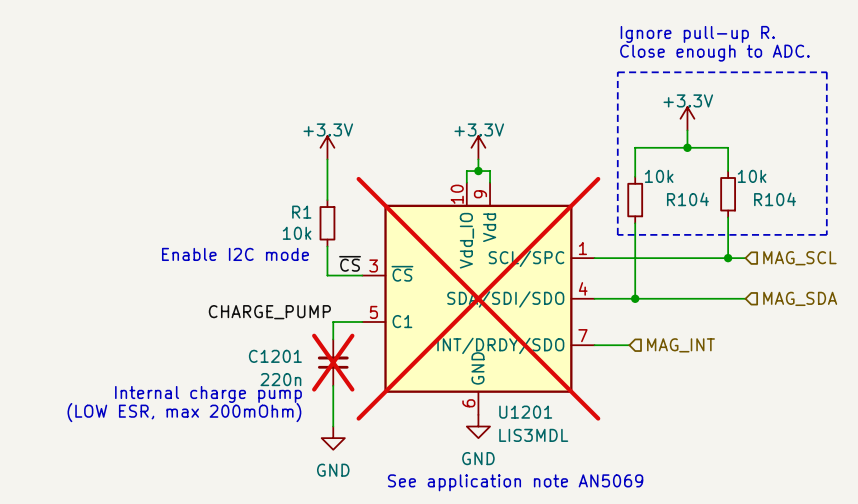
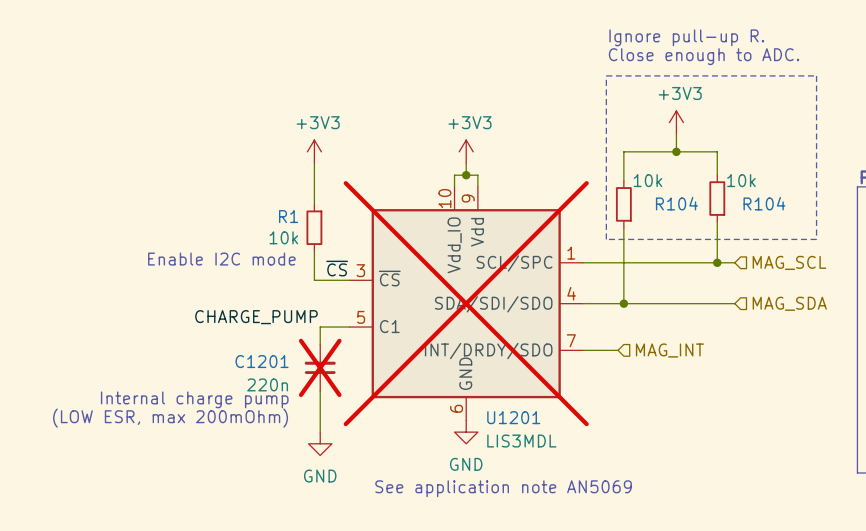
power symbol: +3.3V (687, 118) -> +3V3 (676, 122)
power symbol: +3.3V (327, 147) -> +3V3 (314, 151)
power symbol: +3.3V (478, 147) -> +3V3 (466, 151)

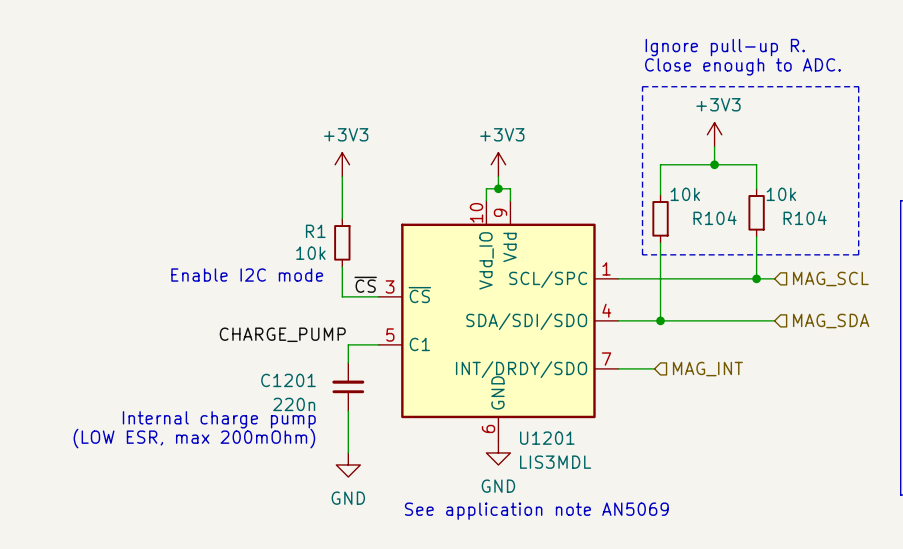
U1201 do-not-place cross: (466, 303) -> none
C1201 do-not-place cross: (320, 367) -> none

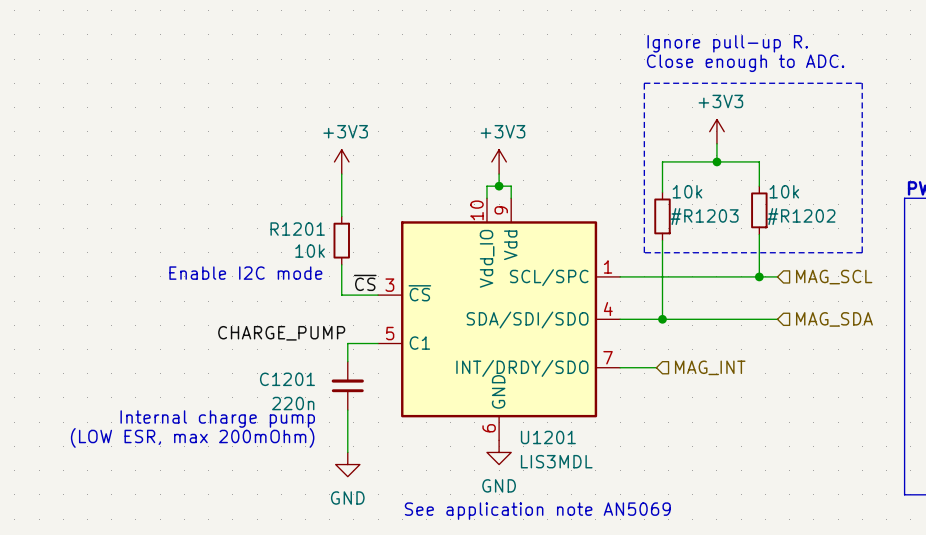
R104: 10k (756, 212) -> none
#R1202: none -> 10k (759, 210)
R104: 10k (660, 218) -> none
#R1203: none -> 10k (662, 216)
R1 name: R1 (315, 231) -> R1201 (297, 229)

